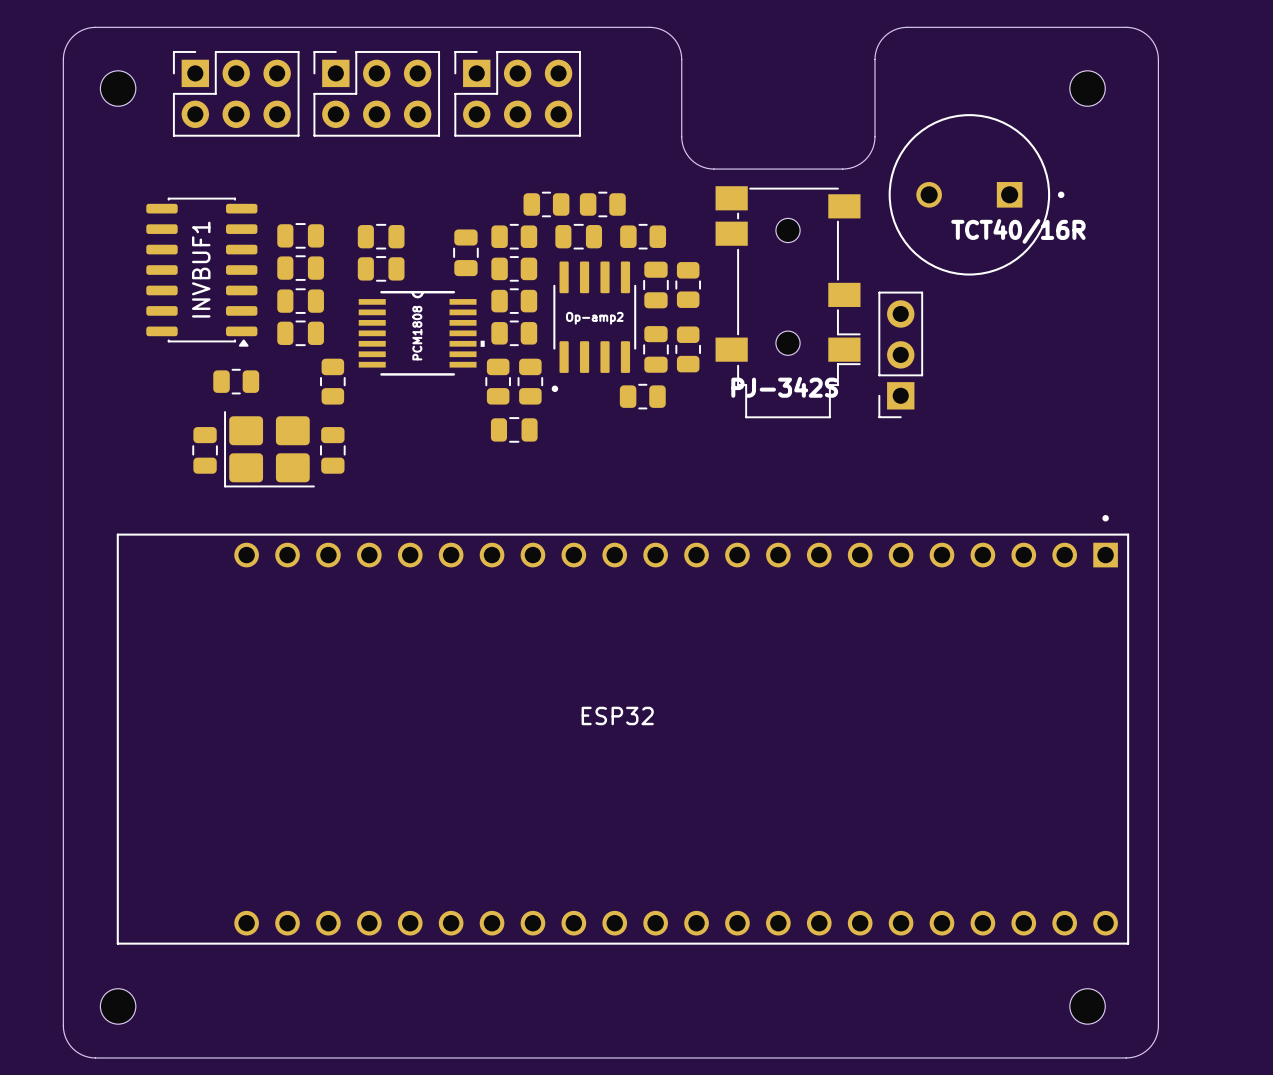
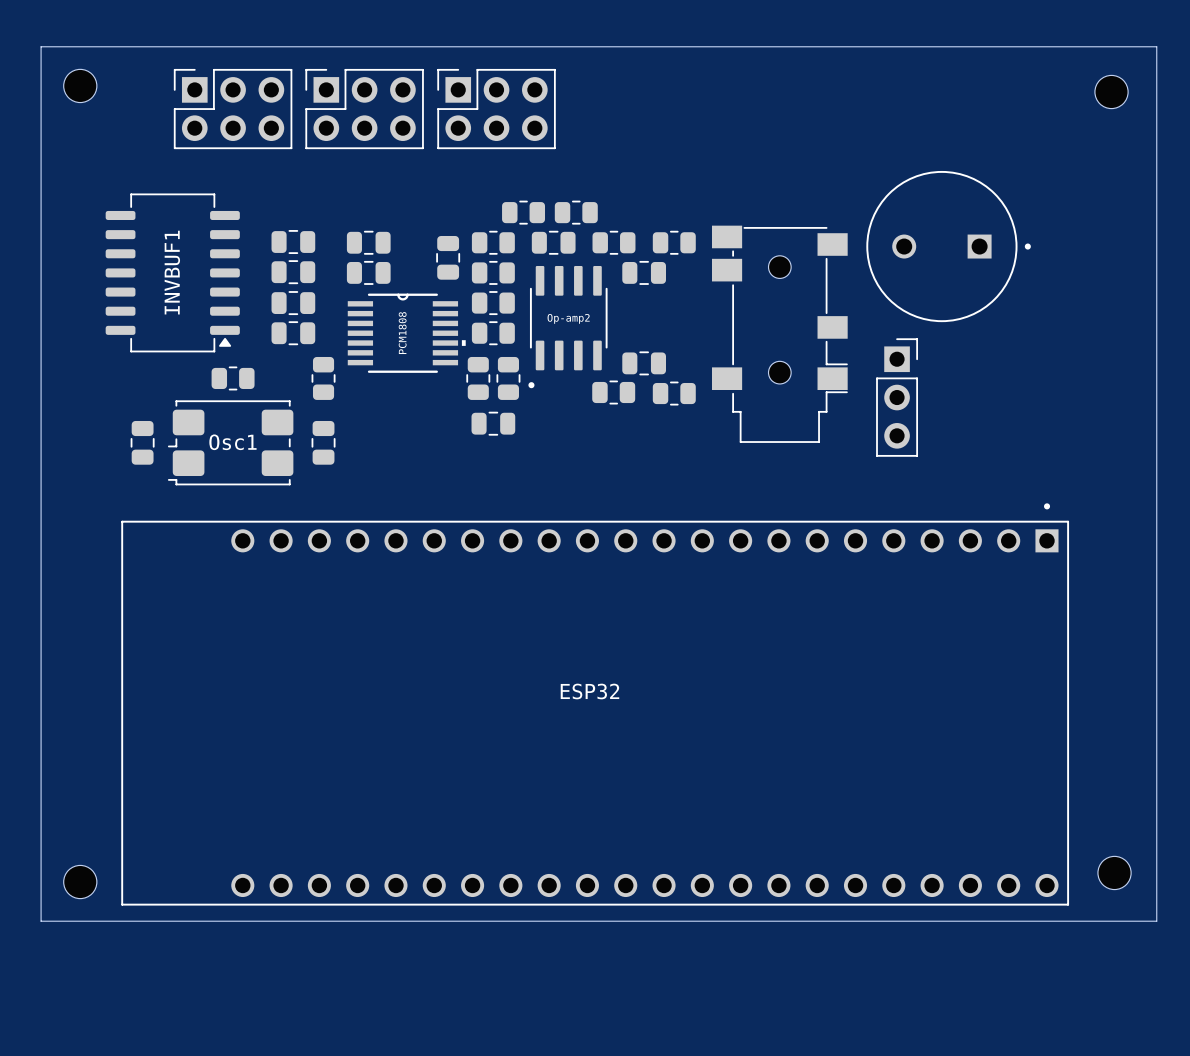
board edge: (95, 27) (81, 30) (72, 36) (66, 45) (63, 59) (63, 1025) (66, 1039) (72, 1048) (84, 1056) (95, 1057) (1126, 1057) (1140, 1054) (1148, 1048) (1155, 1039) (1158, 1025) (1158, 59) (1155, 45) (1148, 36) (1136, 29) (1126, 27) -> (101, 46) (41, 46) (41, 921) (1156, 921) (1156, 46) (1066, 46)
board edge: (649, 27) (666, 32) (678, 45) (681, 59) (682, 144) (686, 153) (693, 162) (703, 167) (713, 169) (842, 169) (853, 167) (862, 162) (871, 150) (874, 140) (874, 59) (876, 48) (882, 39) (890, 32) (907, 27) -> (620, 46) (861, 46)
part position: (118, 88) -> (80, 85)
part position: (1087, 88) -> (1111, 92)
part position: (976, 194) -> (948, 246)
INVBUF1 footprint: [146, 197, 258, 347] -> [105, 193, 240, 353]
text: TCT40/16R (1018, 231) -> none
part rotation: 0° (655, 285) -> 90° clockwise (644, 272)
part rotation: 0° (688, 285) -> 90° clockwise (674, 242)
part position: (688, 285) -> (674, 242)
part position: (788, 302) -> (779, 334)
part rotation: 0° (655, 349) -> 90° clockwise (644, 363)
part rotation: 0° (688, 349) -> 90° clockwise (674, 393)
part position: (688, 349) -> (674, 393)
part rotation: 0° (900, 354) -> 180° (897, 397)
text: PJ-342S (784, 387) -> none
part: (269, 449) -> none
part position: (205, 450) -> (142, 442)
Osc1: none -> (230, 442)
part position: (118, 1006) -> (80, 882)
part position: (1087, 1006) -> (1114, 872)

